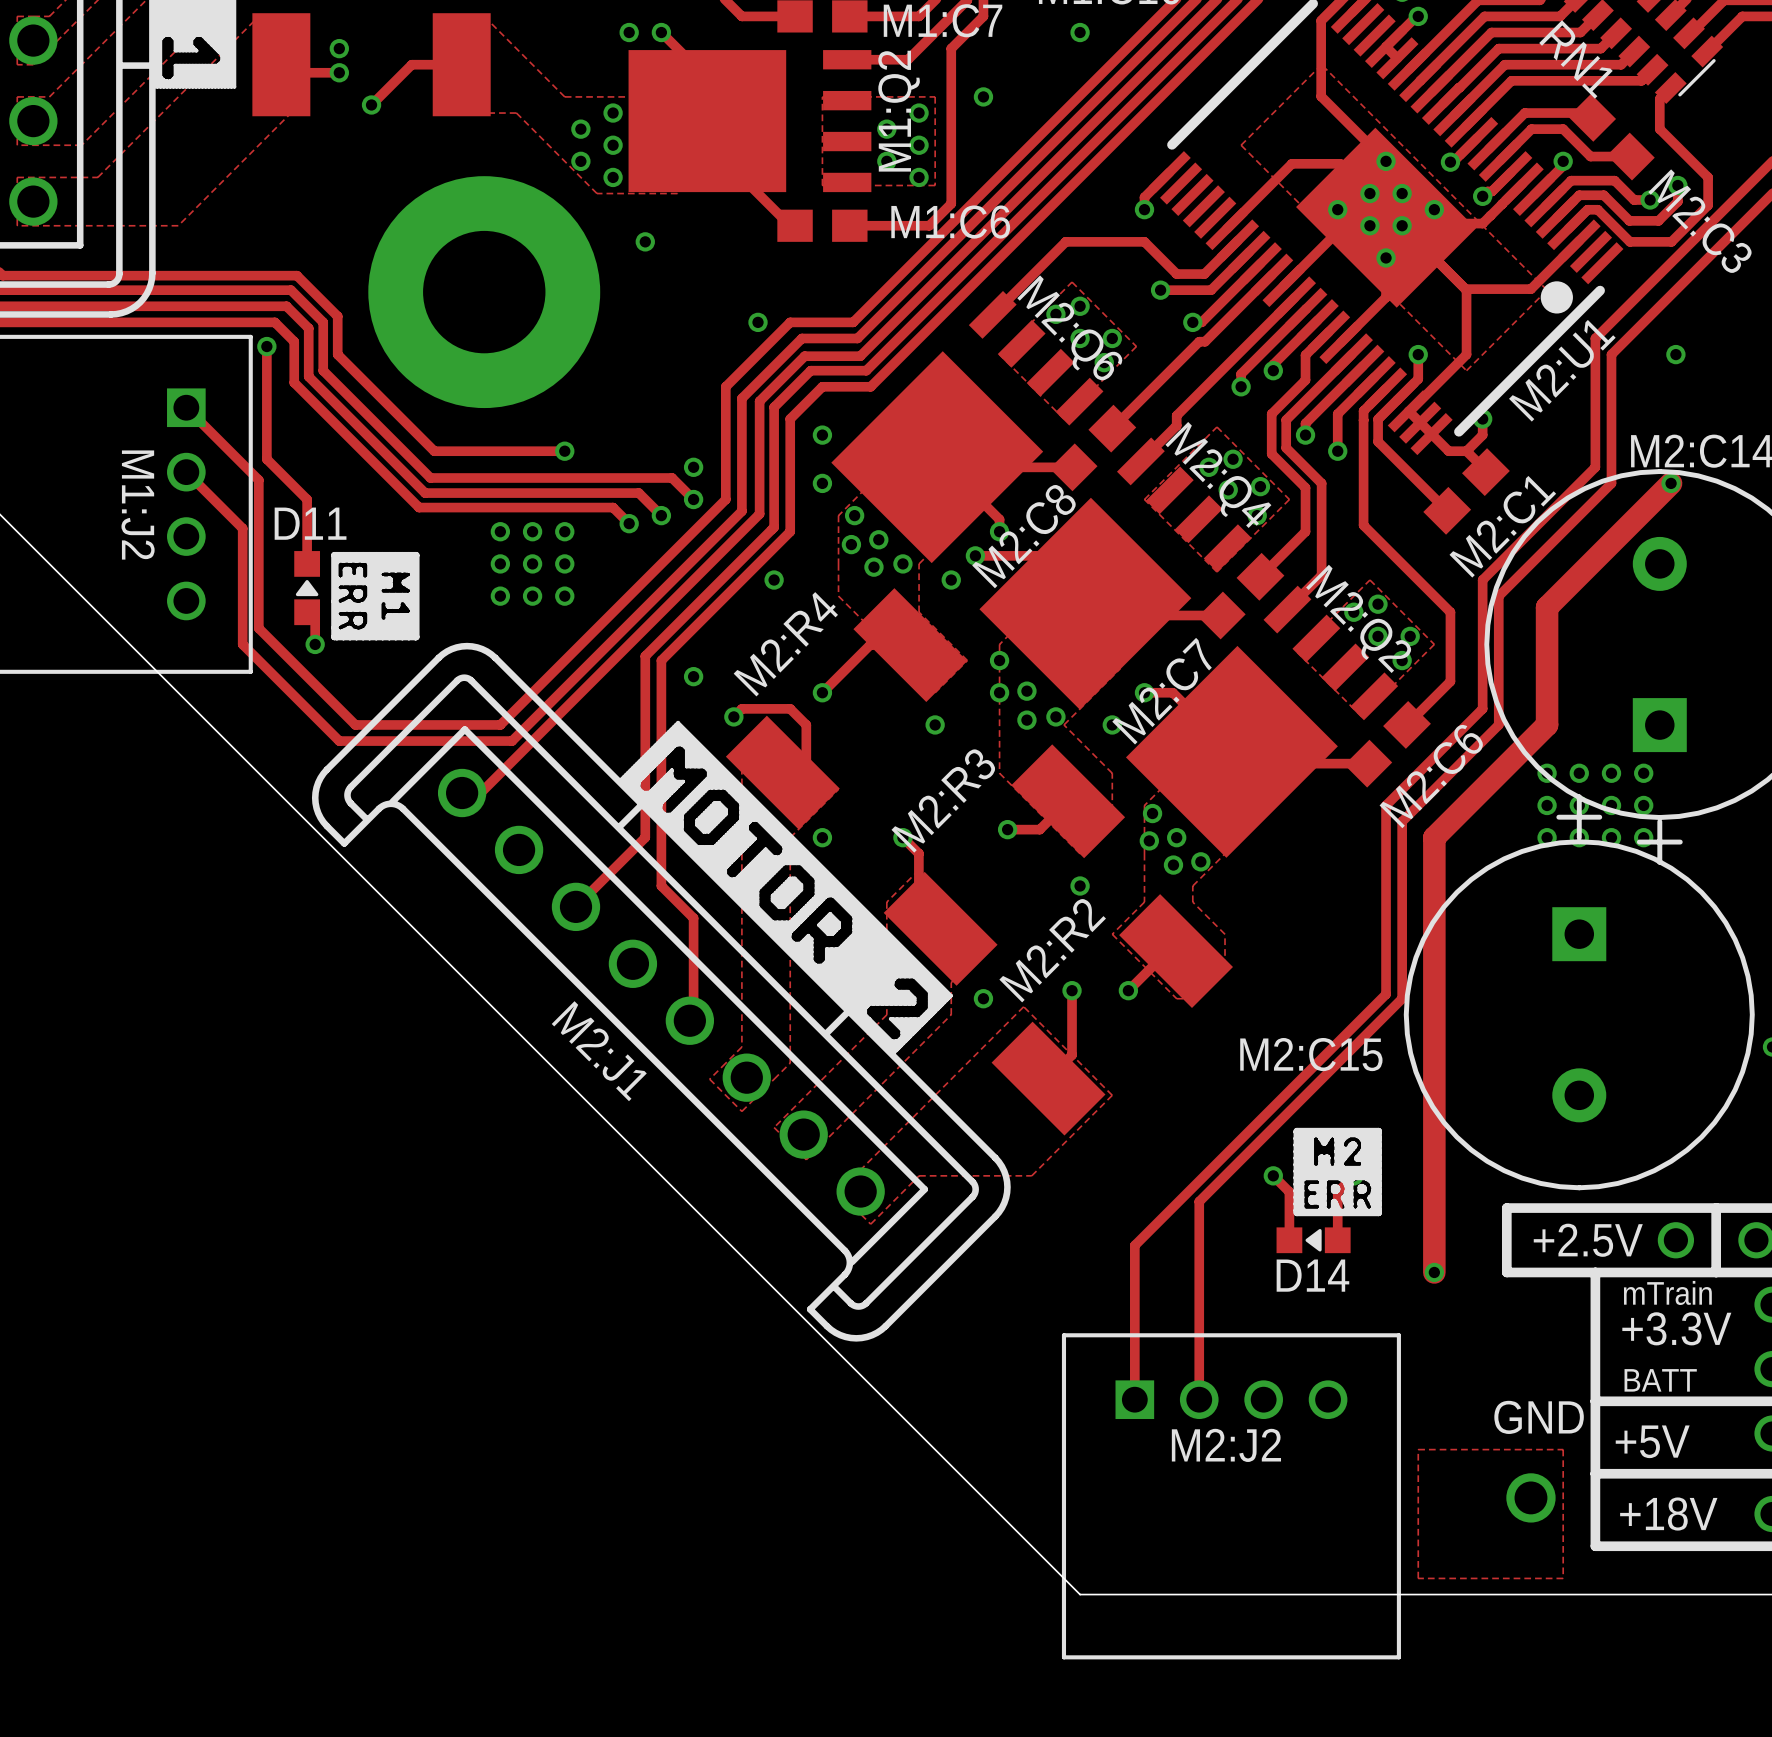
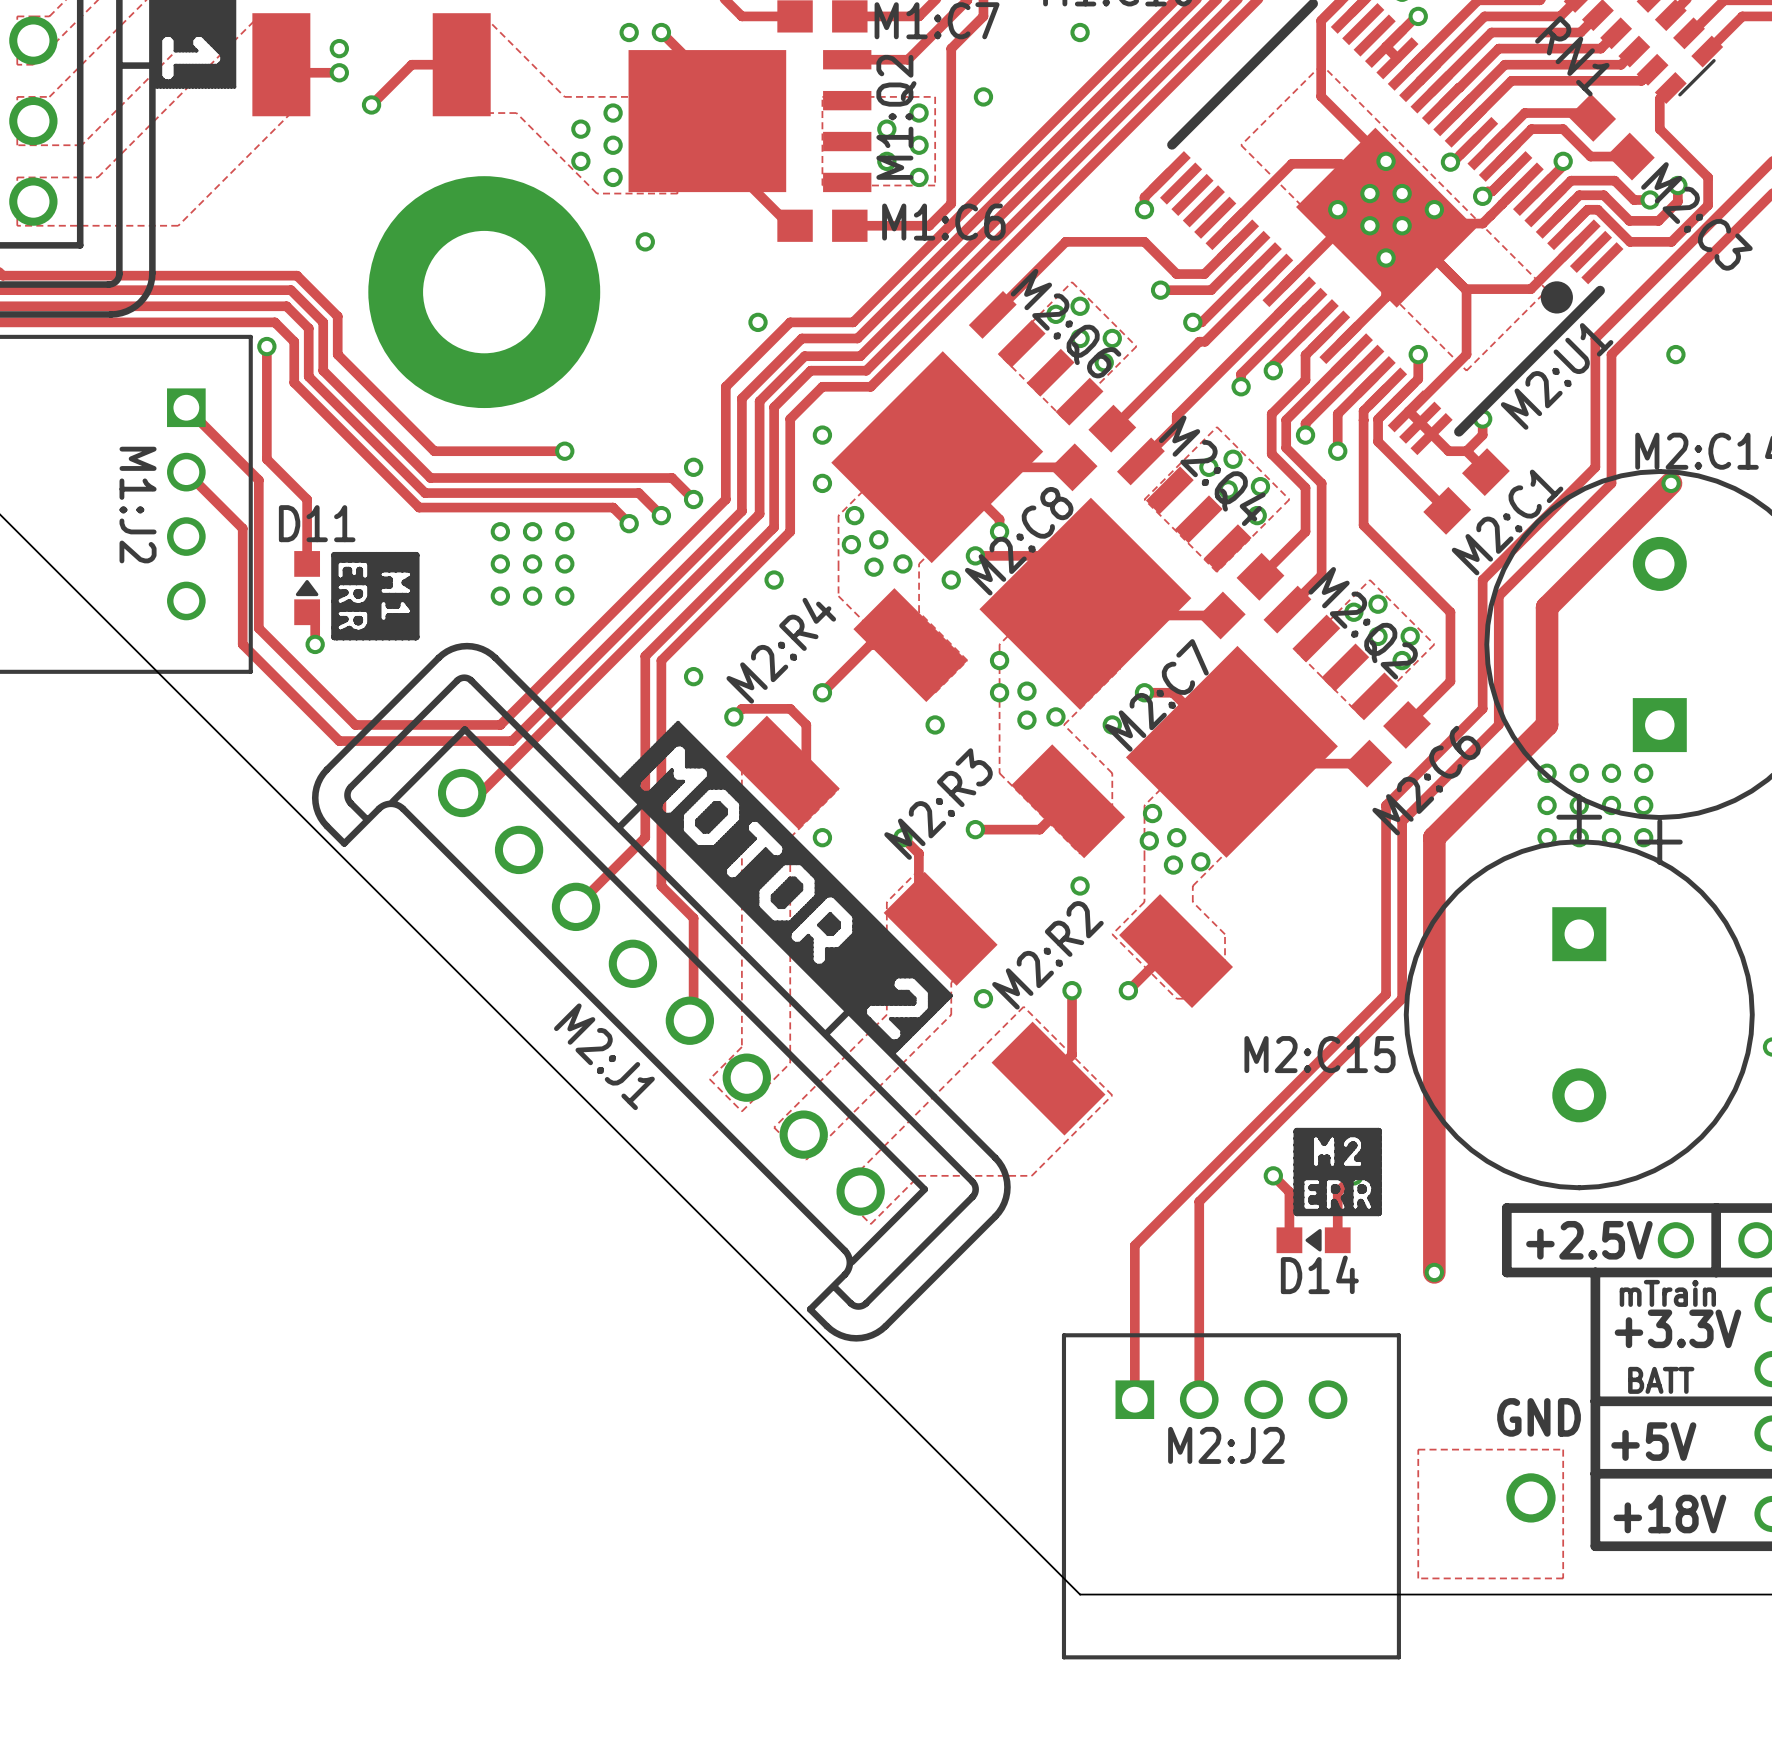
track: none -> (975, 829) (1007, 829)
via position: (1007, 829) -> (975, 829)

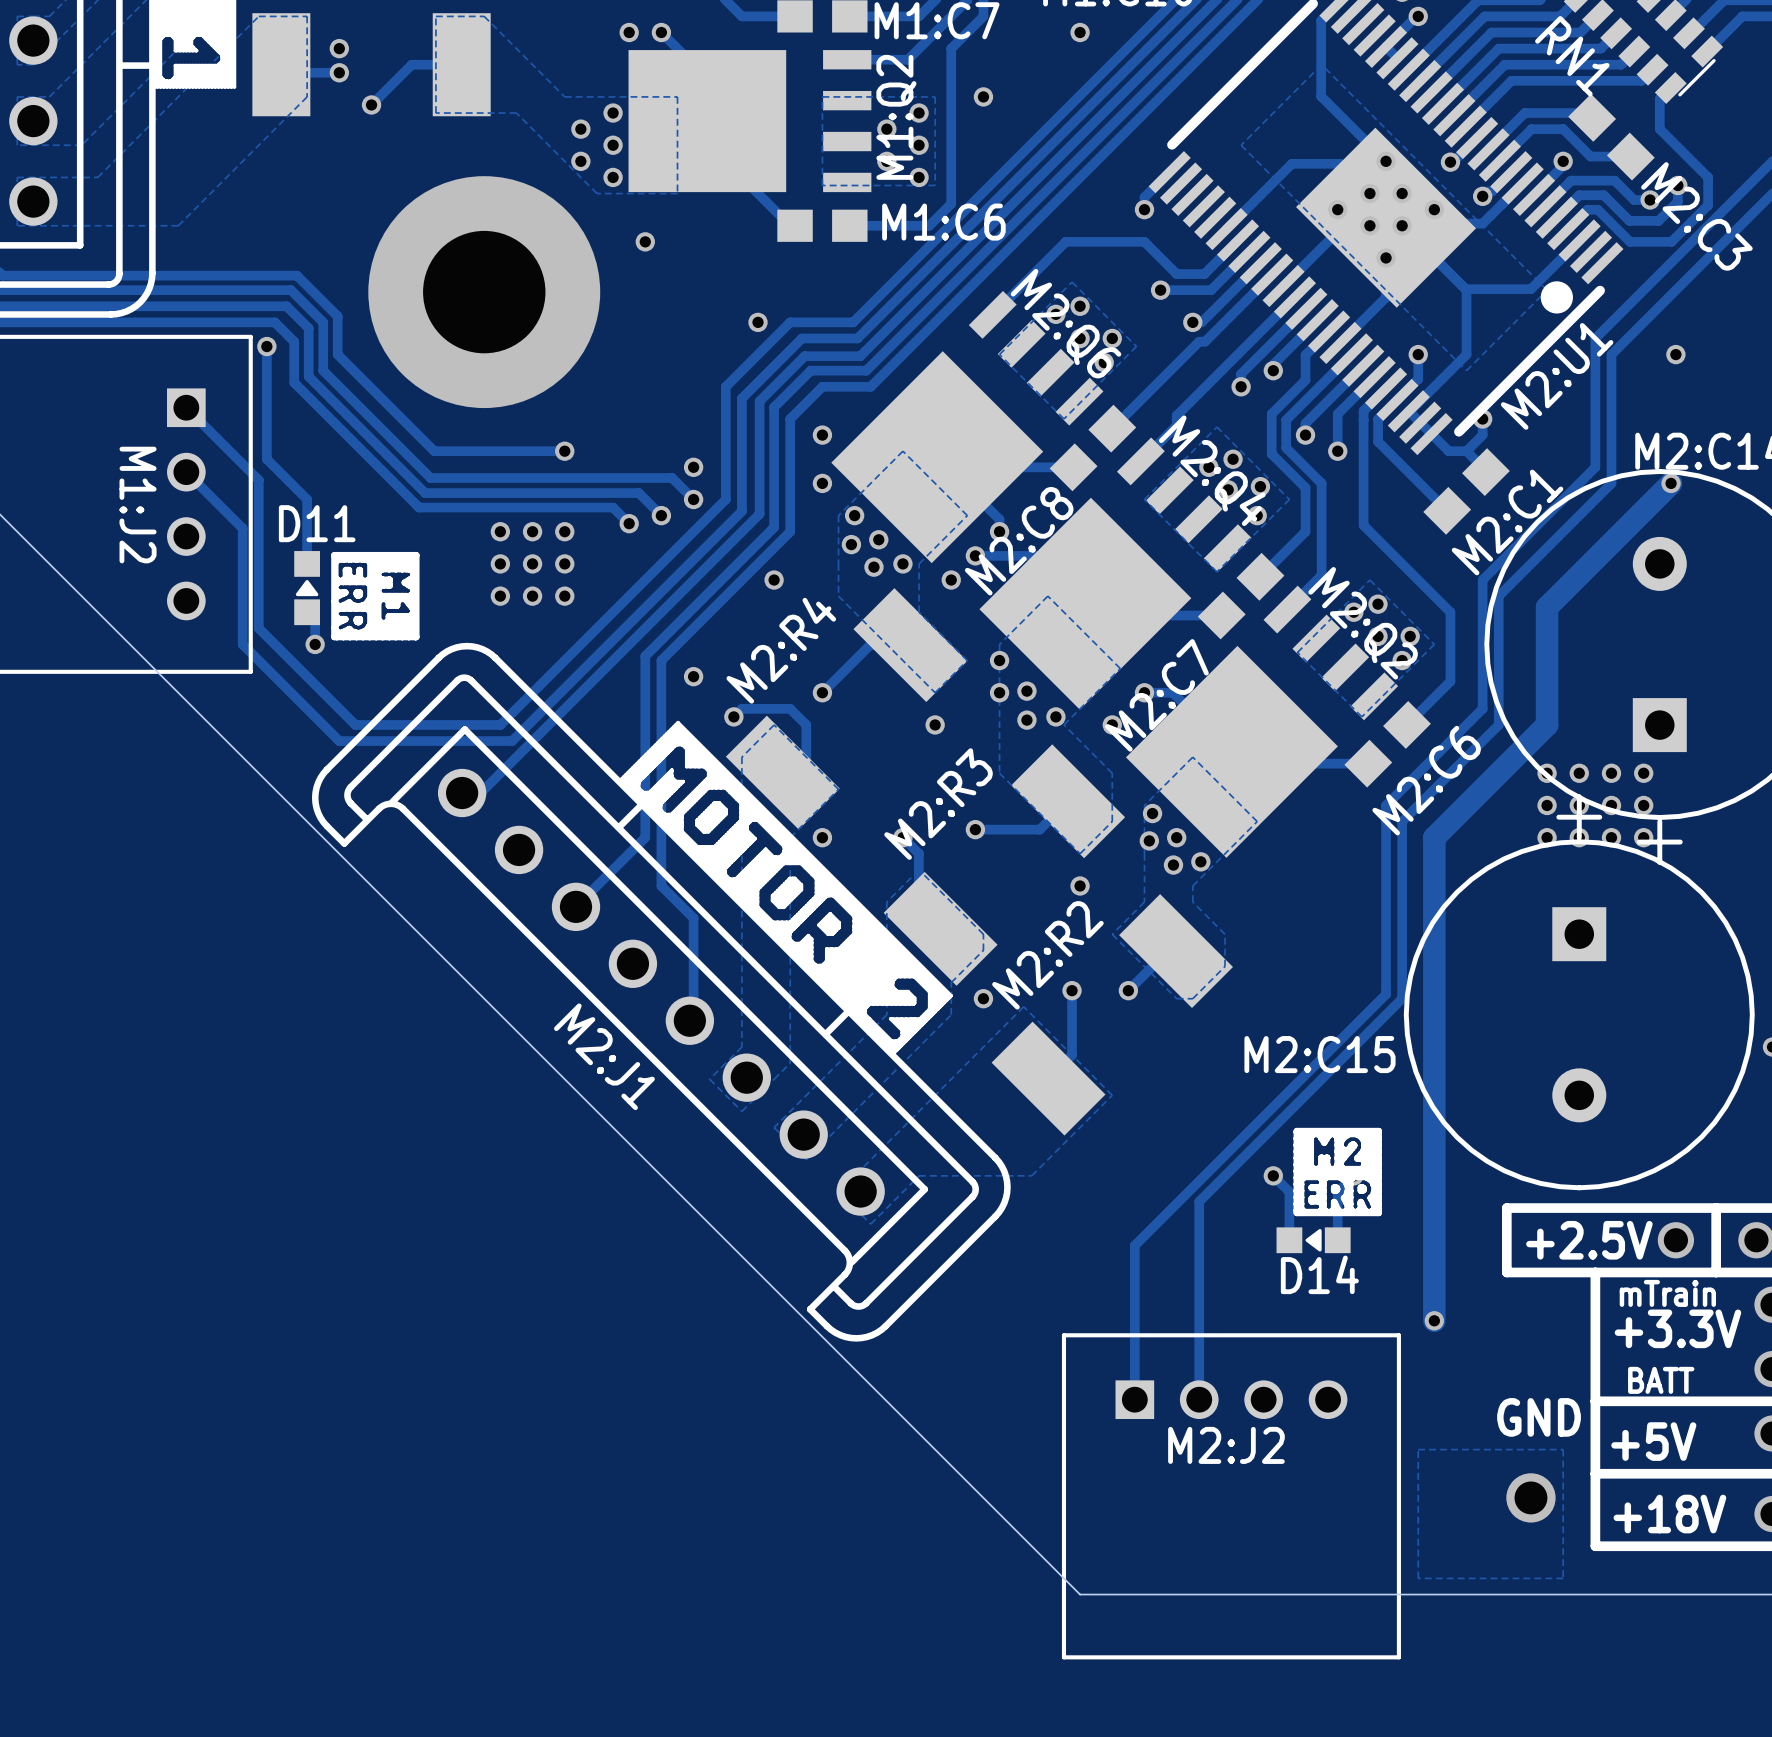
track: none -> (1434, 1272) (1434, 1320)
via position: (1434, 1272) -> (1434, 1320)

